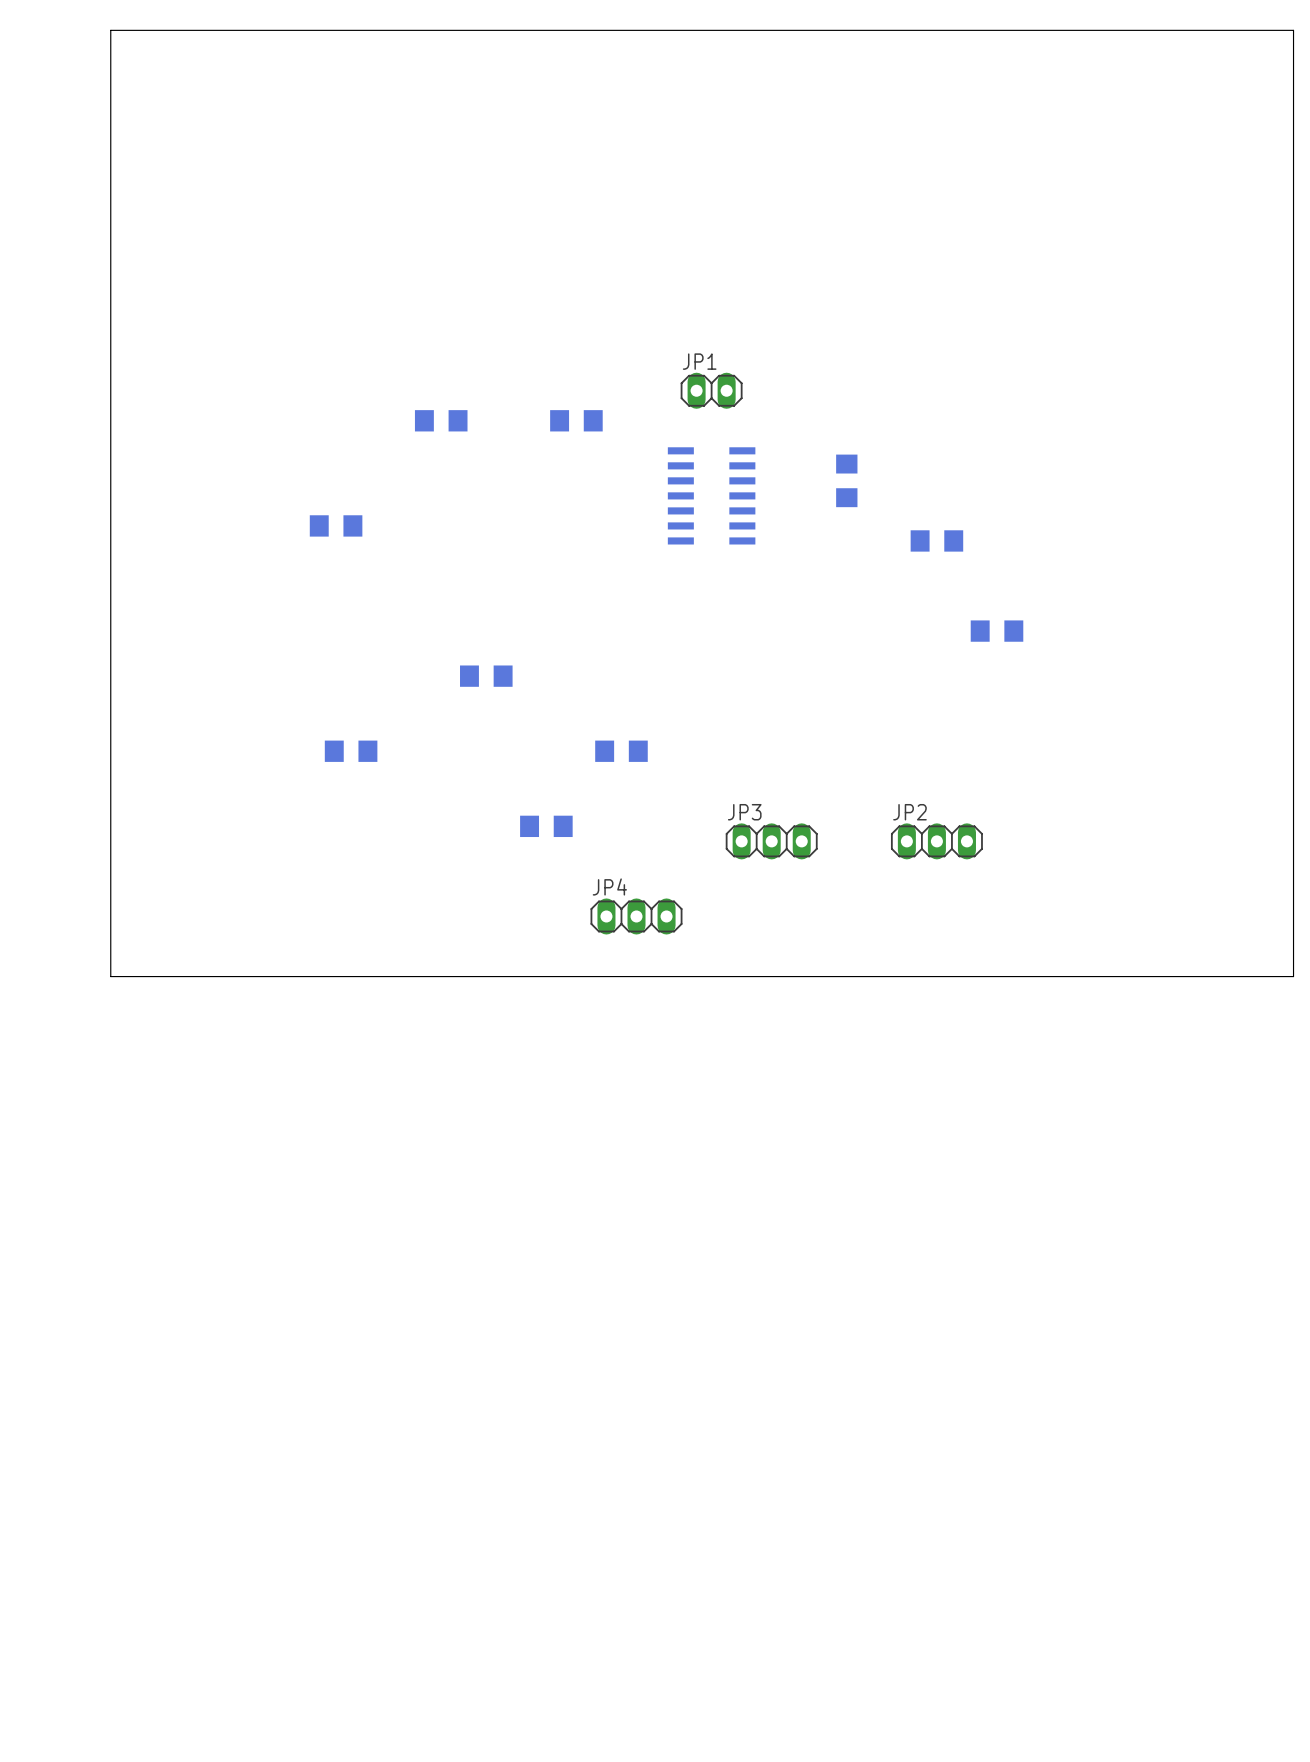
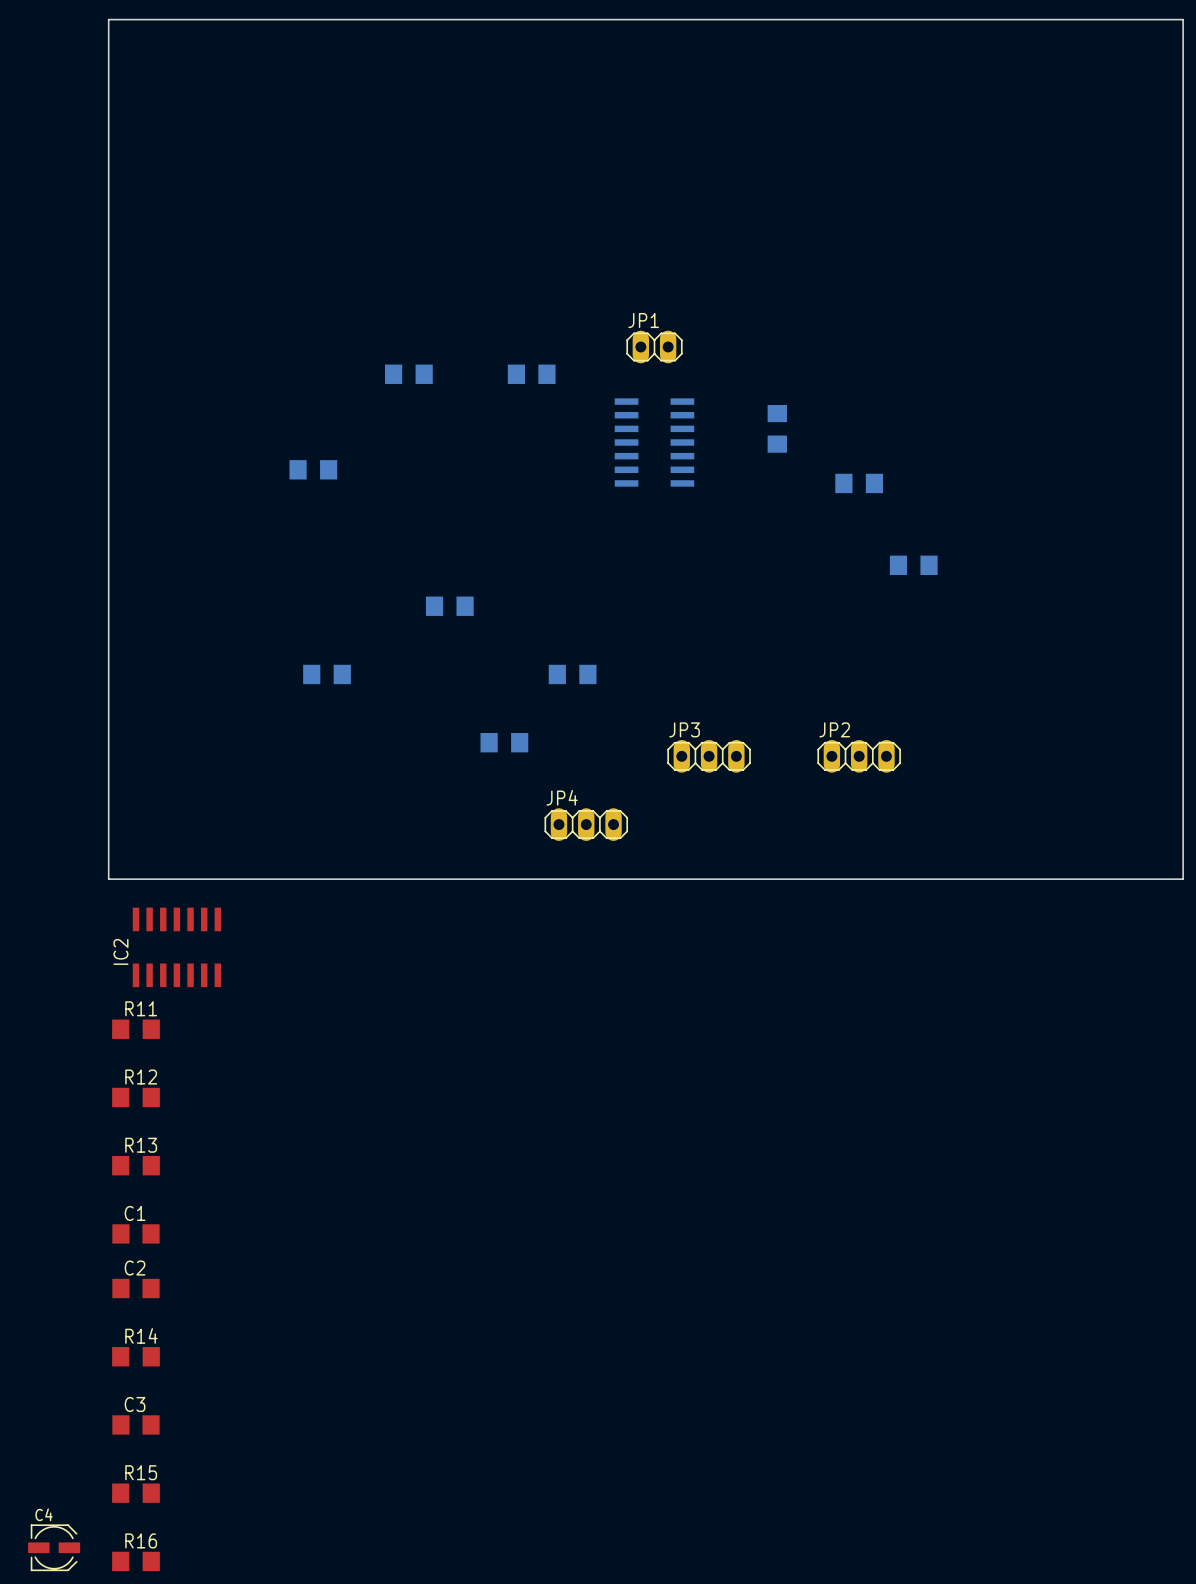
IC2: none -> (176, 947)
R11: none -> (135, 1029)
R12: none -> (135, 1097)
R13: none -> (135, 1165)
C1: none -> (135, 1233)
C2: none -> (135, 1288)
R14: none -> (135, 1356)
C3: none -> (135, 1424)
R15: none -> (135, 1493)
C4: none -> (54, 1547)
R16: none -> (135, 1561)

